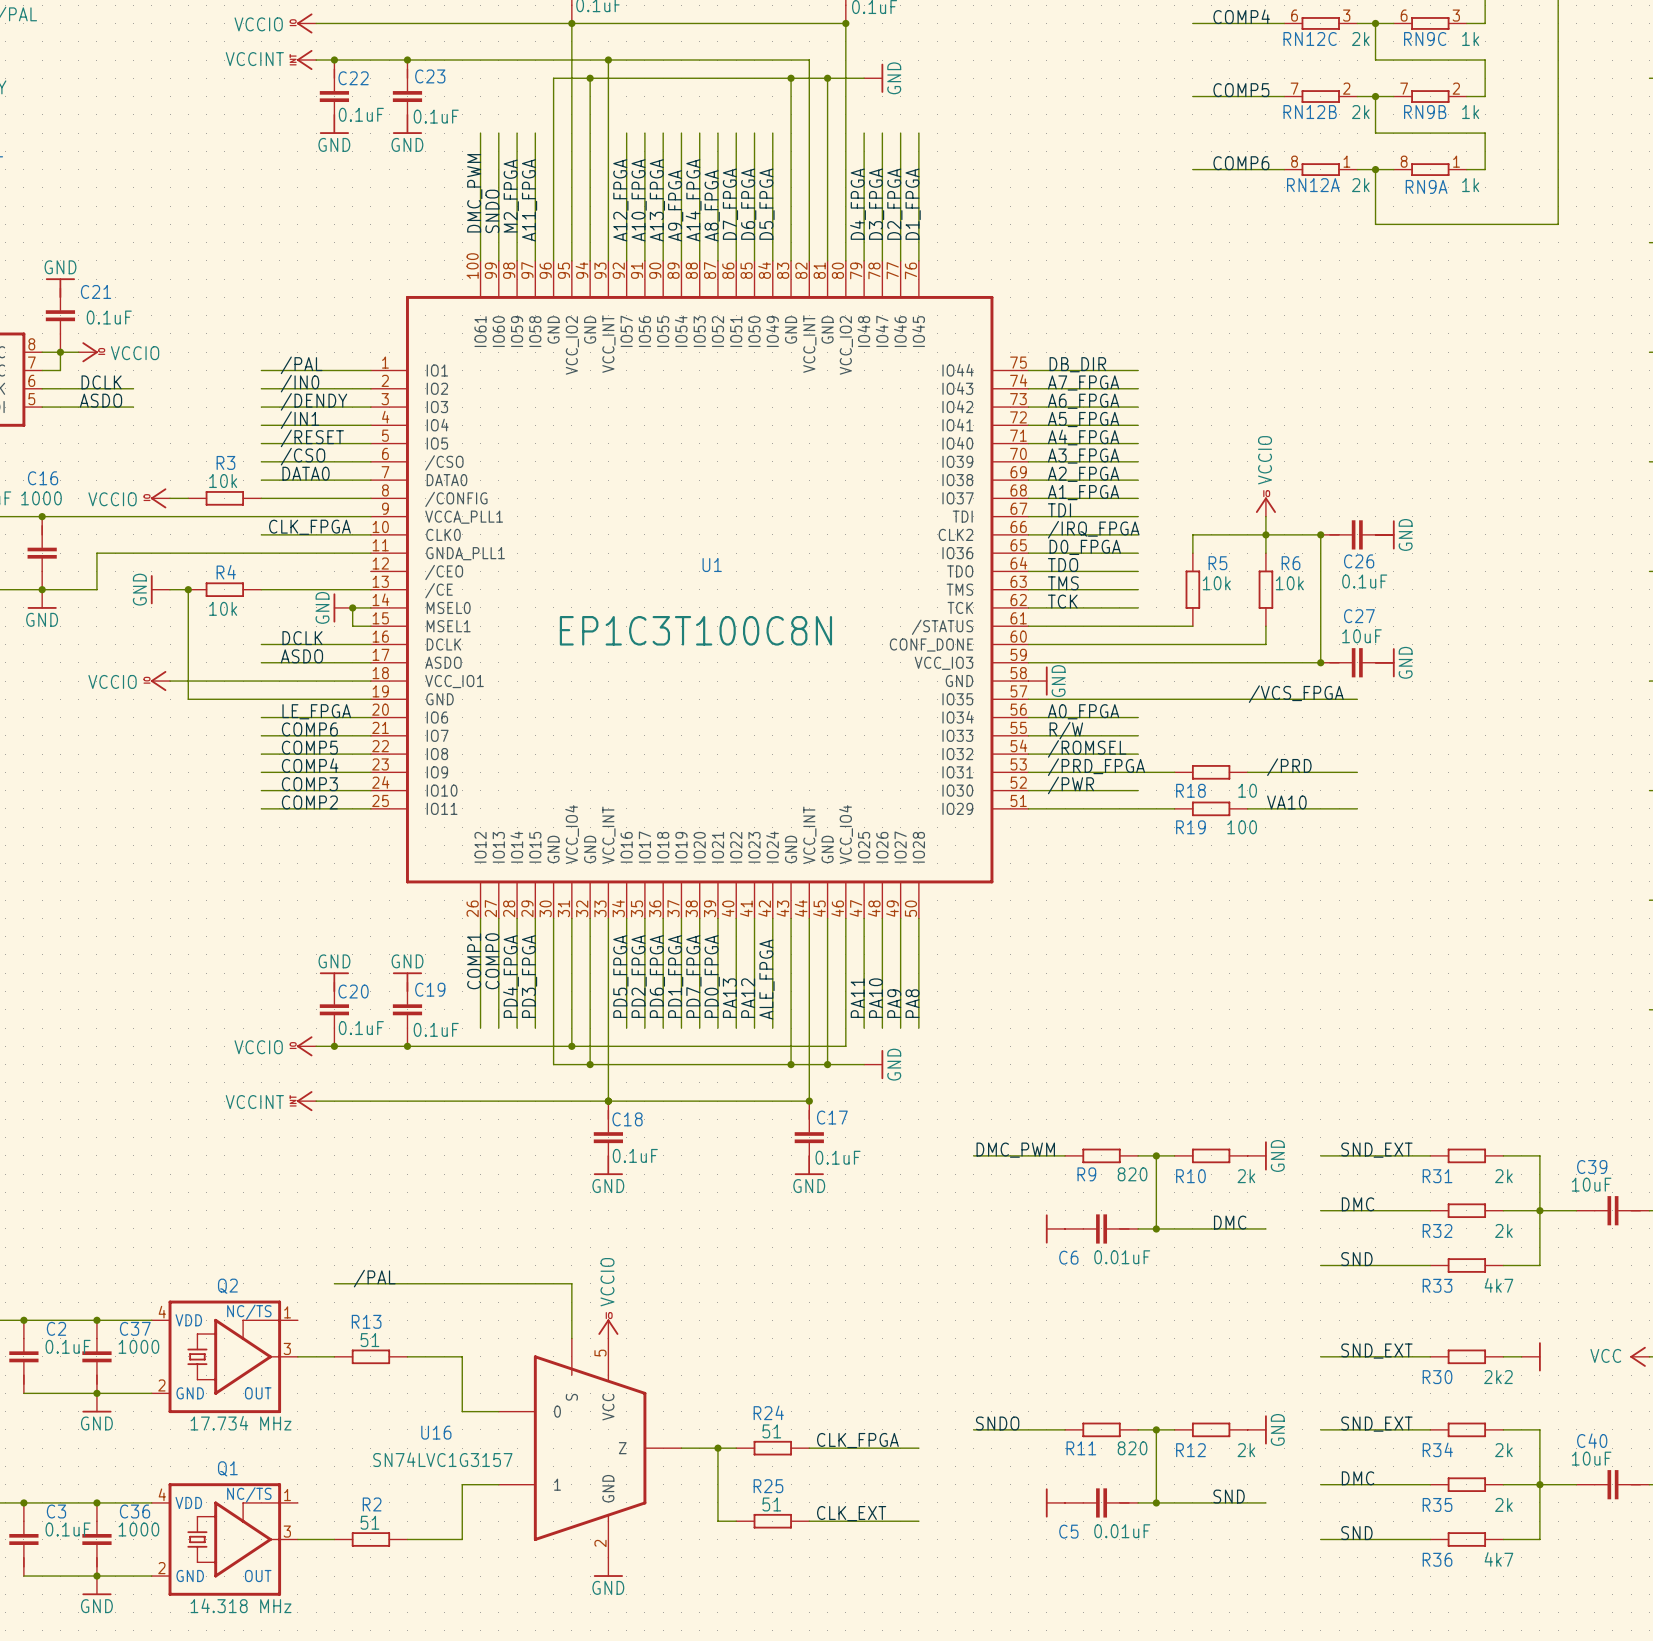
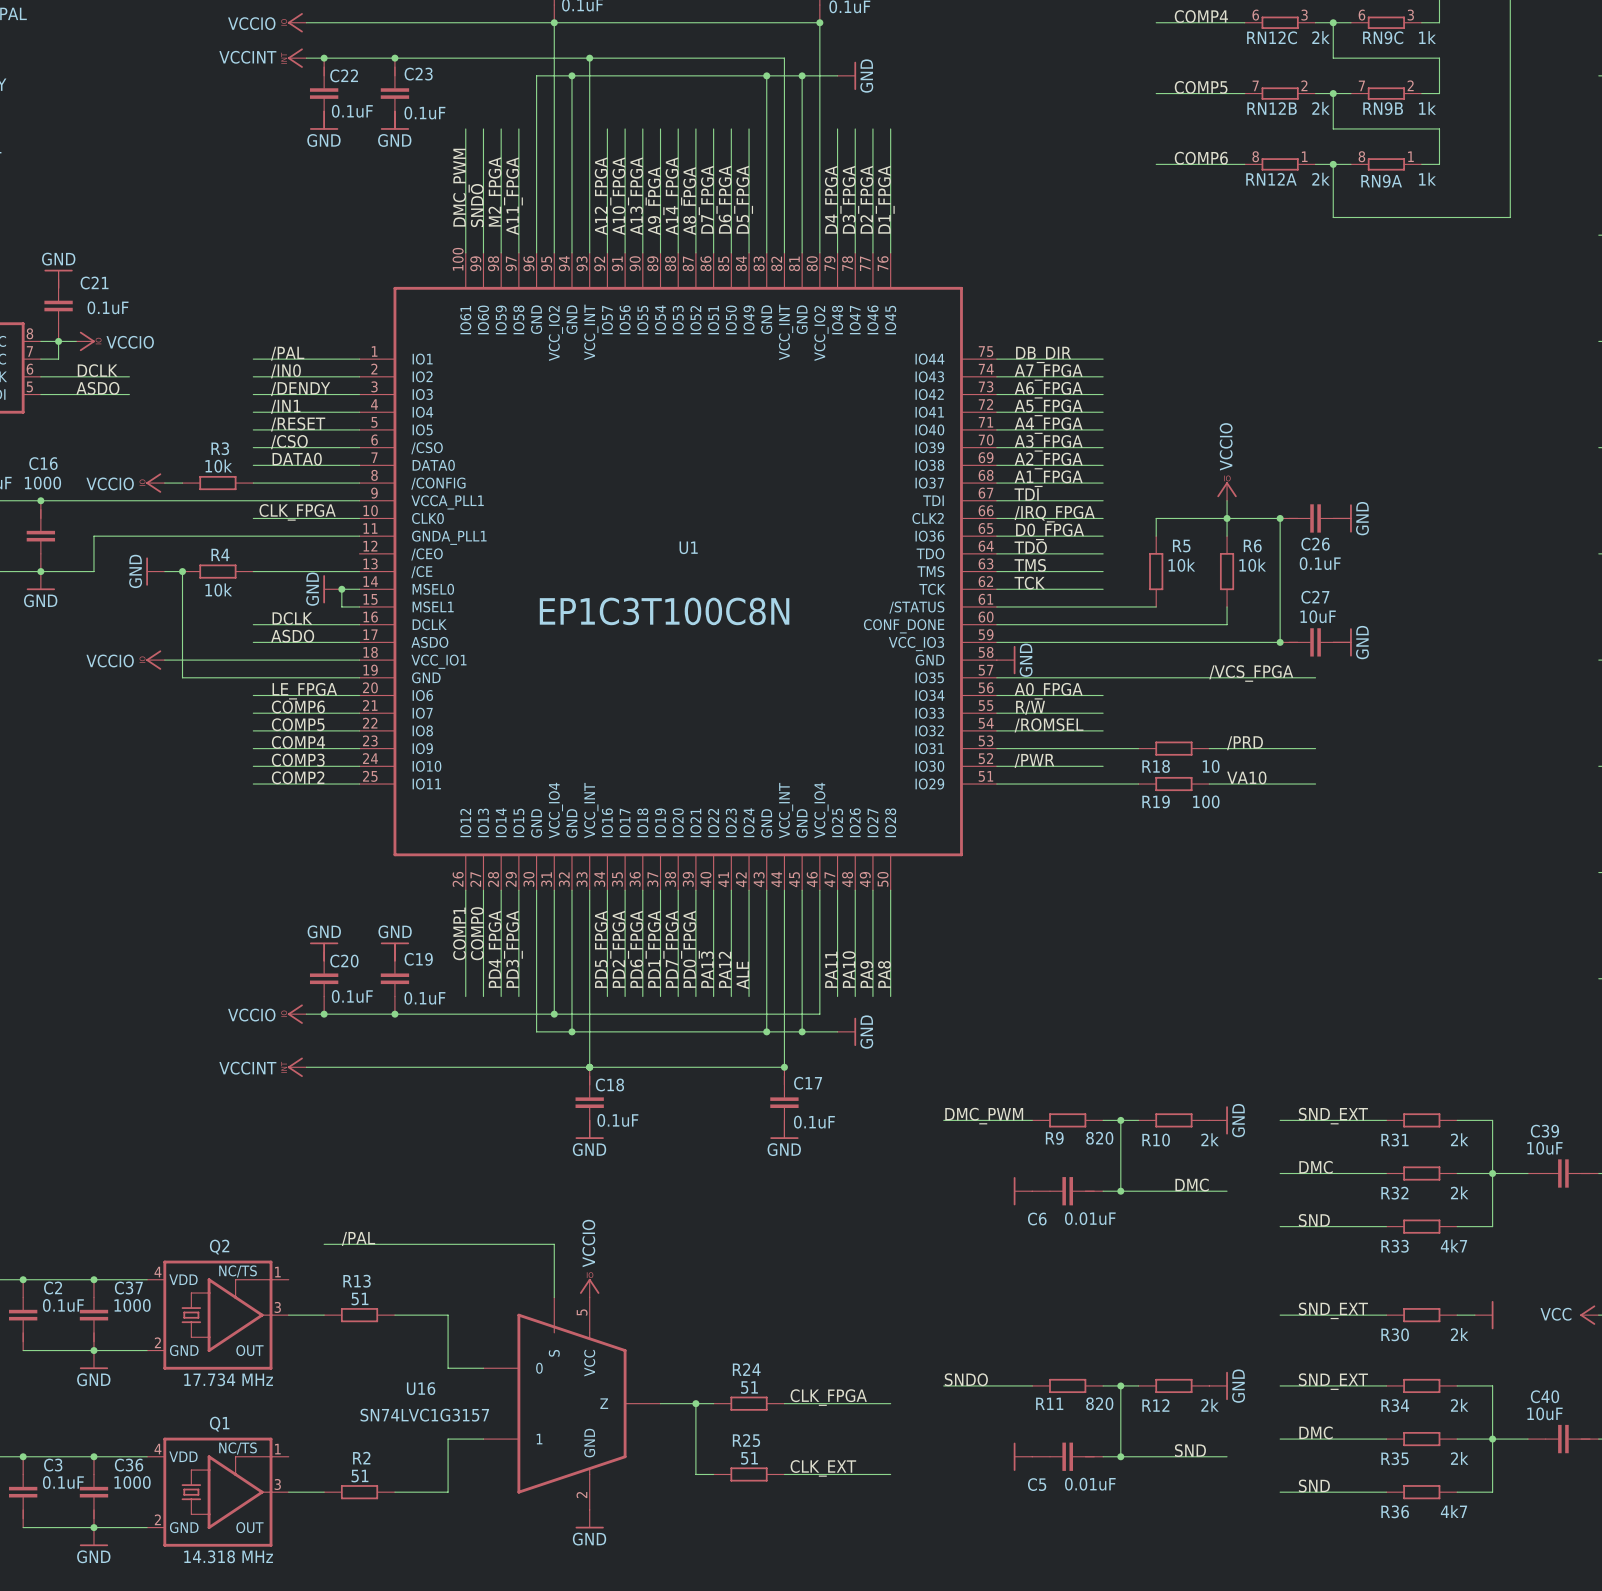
label: /PRD_FPGA (1096, 767) -> none
label: ALE_FPGA (766, 979) -> ALE (742, 975)
R30 value: 2k2 (1498, 1377) -> 2k (1459, 1334)

